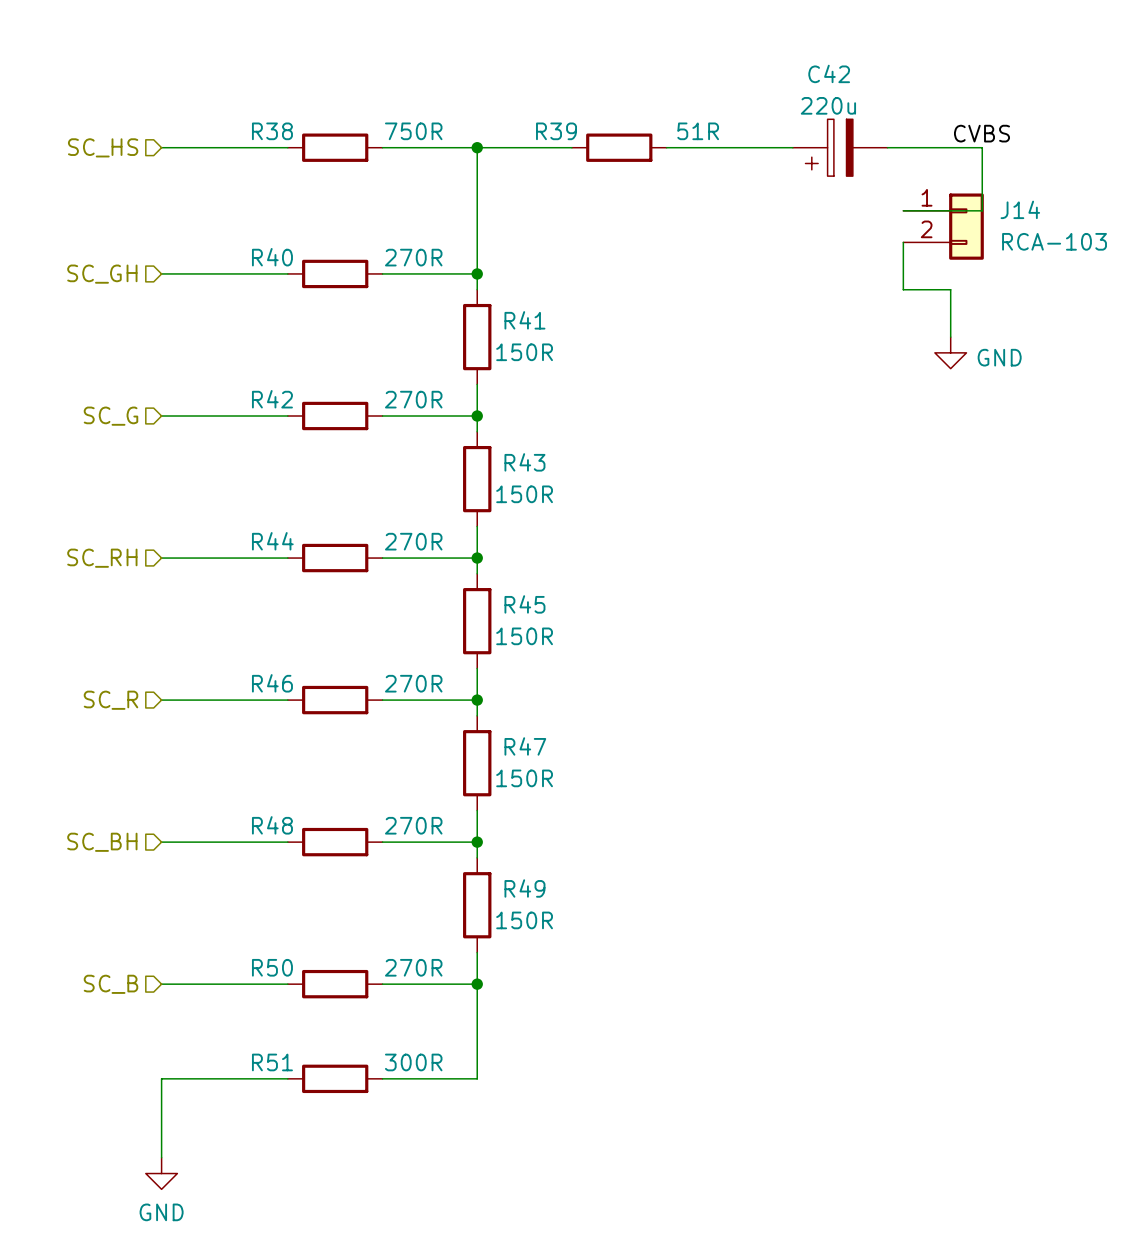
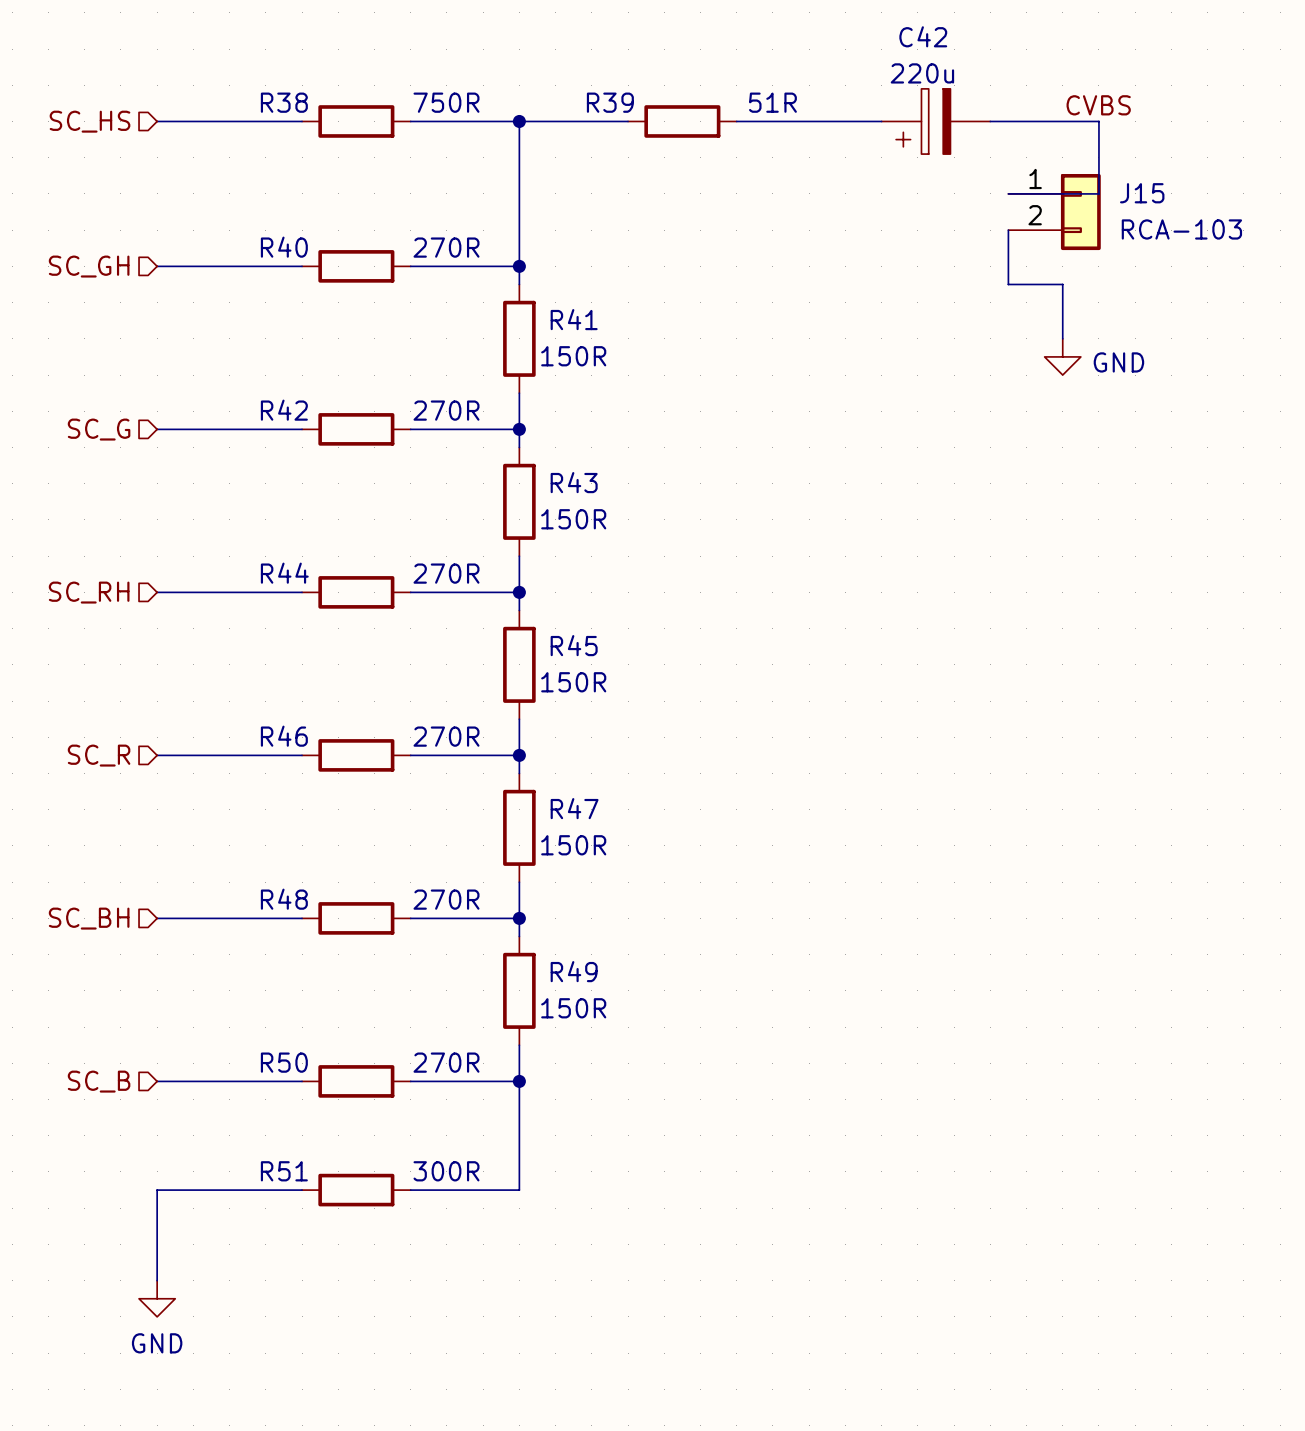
J14 name: J14 (1020, 209) -> J15 (1142, 193)

